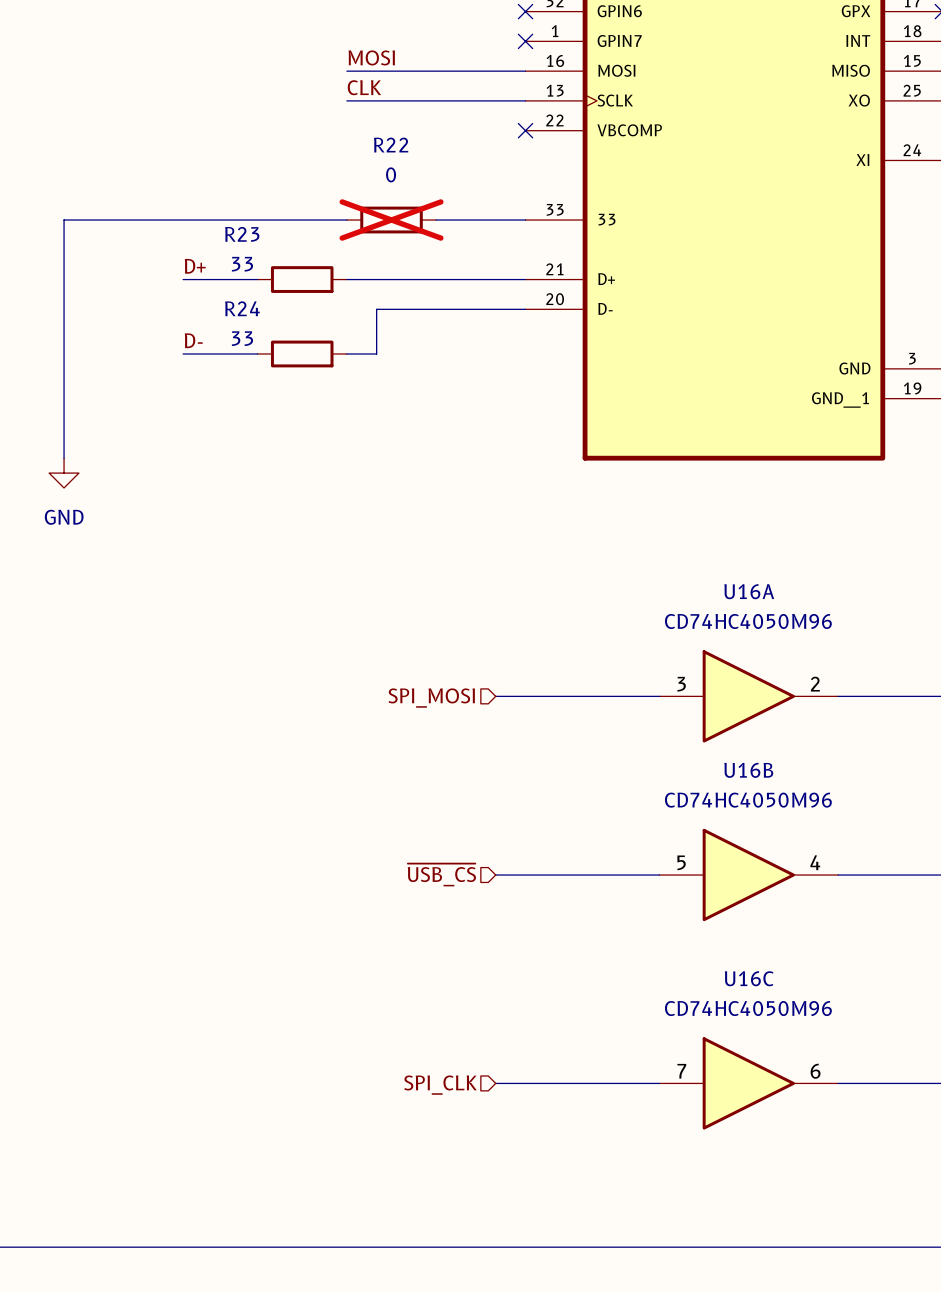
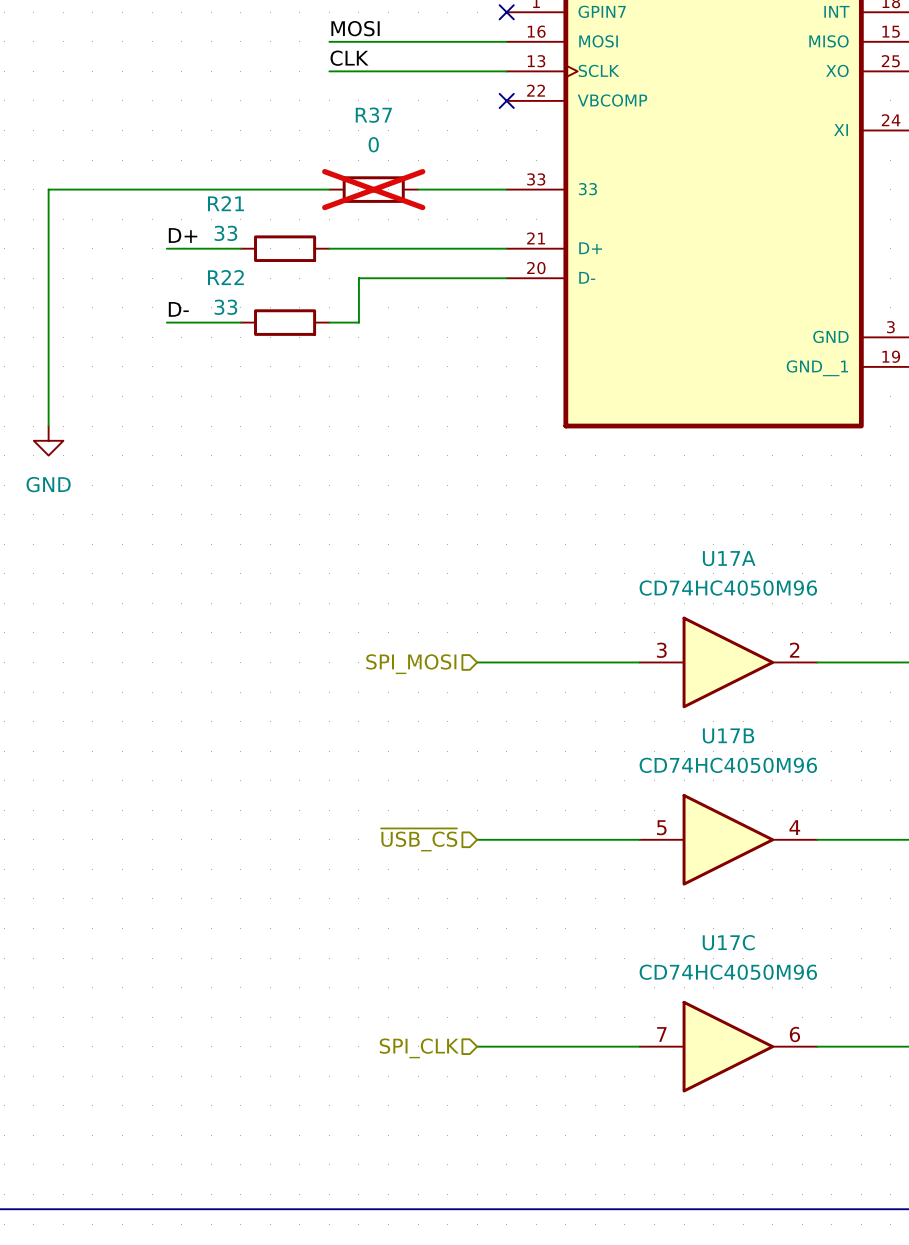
R22 name: R22 (391, 145) -> R37 (373, 115)
R23 name: R23 (242, 234) -> R21 (226, 203)
R24 name: R24 (242, 308) -> R22 (225, 277)
U16A name: U16A (749, 591) -> U17A (729, 558)
U16B name: U16B (748, 770) -> U17B (728, 735)
U16C name: U16C (749, 978) -> U17C (728, 942)

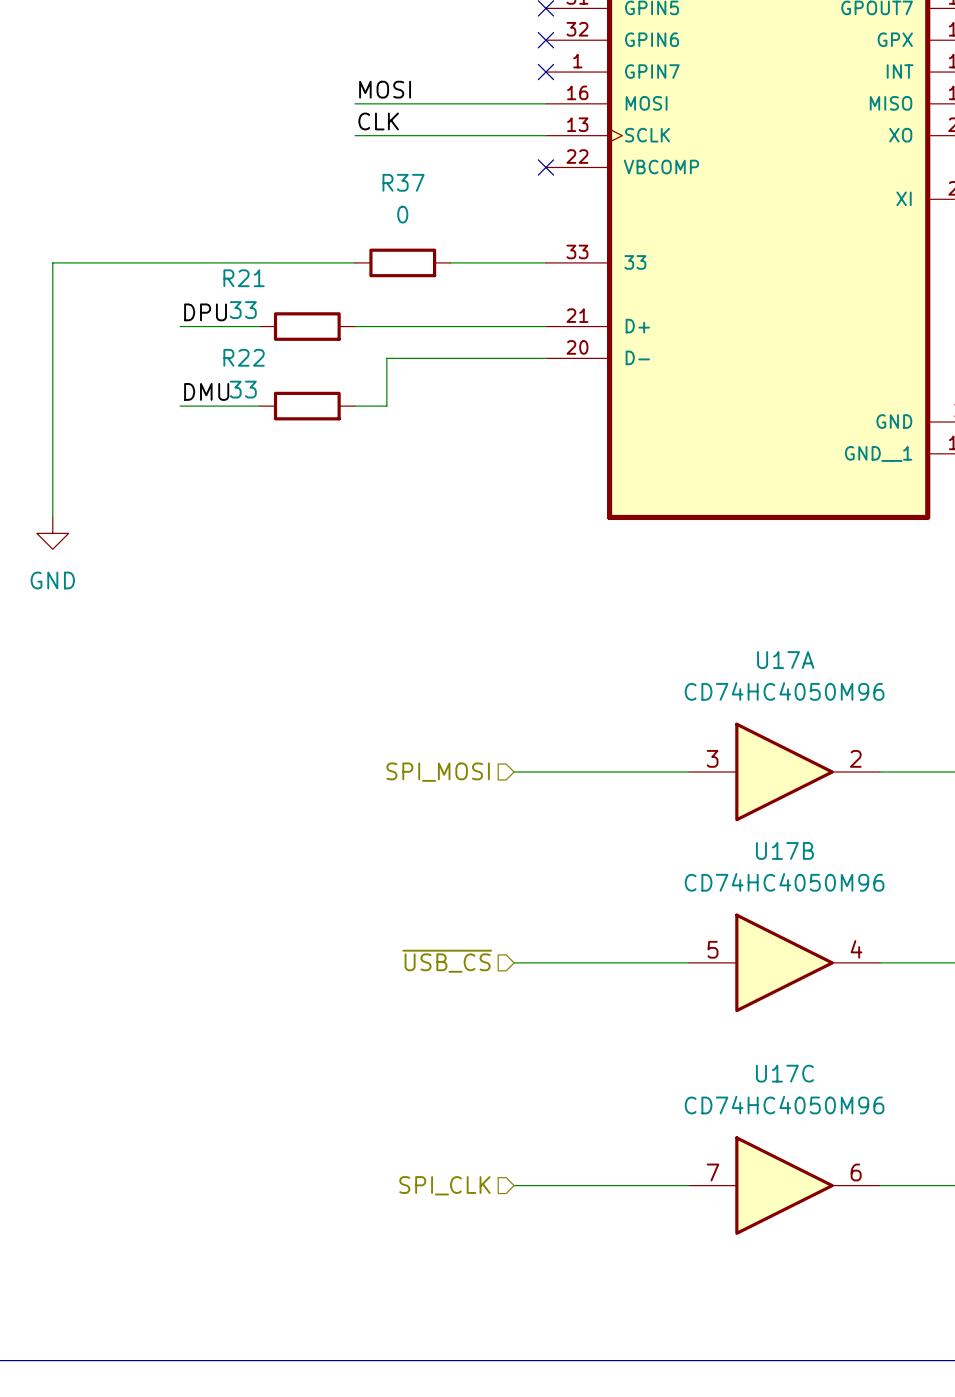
R37 do-not-place cross: (373, 189) -> none
label: D+ (183, 235) -> DPU (205, 312)
label: D- (178, 309) -> DMU (206, 391)

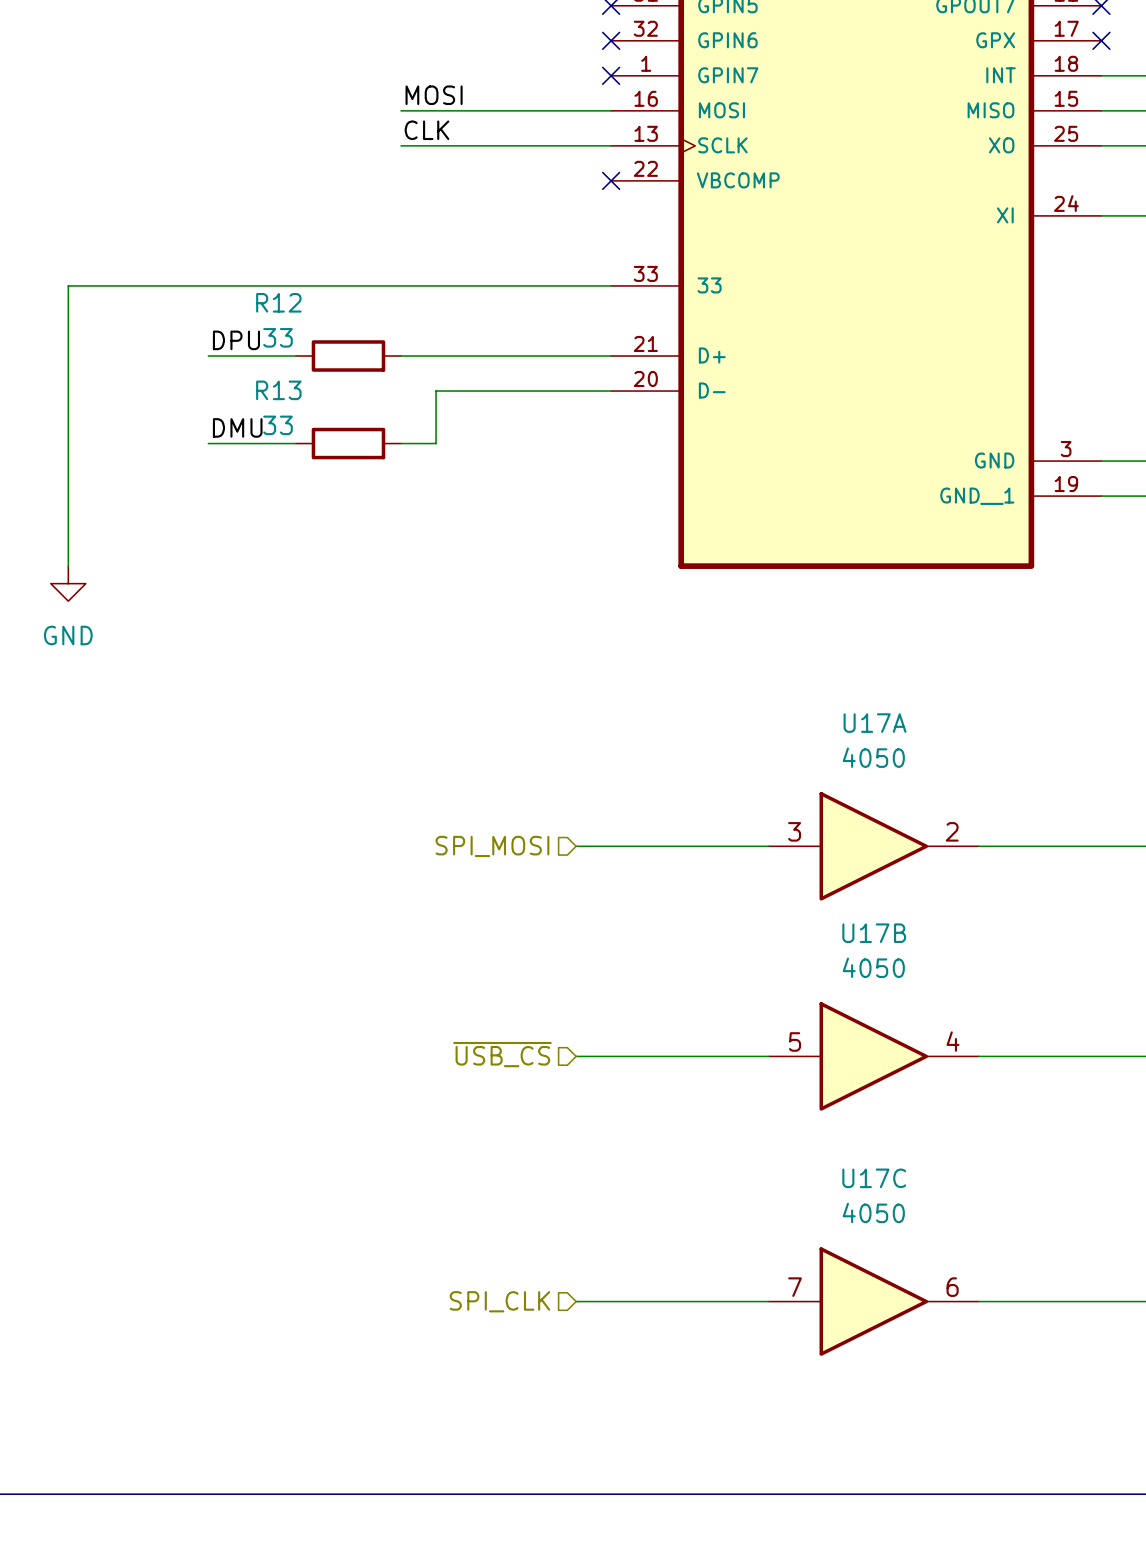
wire: none -> (401, 285) (506, 285)
R37: 0 (402, 262) -> none
R21 name: R21 (244, 278) -> R12 (278, 302)
R22 name: R22 (244, 357) -> R13 (278, 390)
U17A value: CD74HC4050M96 (784, 691) -> 4050 (873, 757)
U17B value: CD74HC4050M96 (784, 882) -> 4050 (873, 967)
U17C value: CD74HC4050M96 (784, 1105) -> 4050 (873, 1212)

